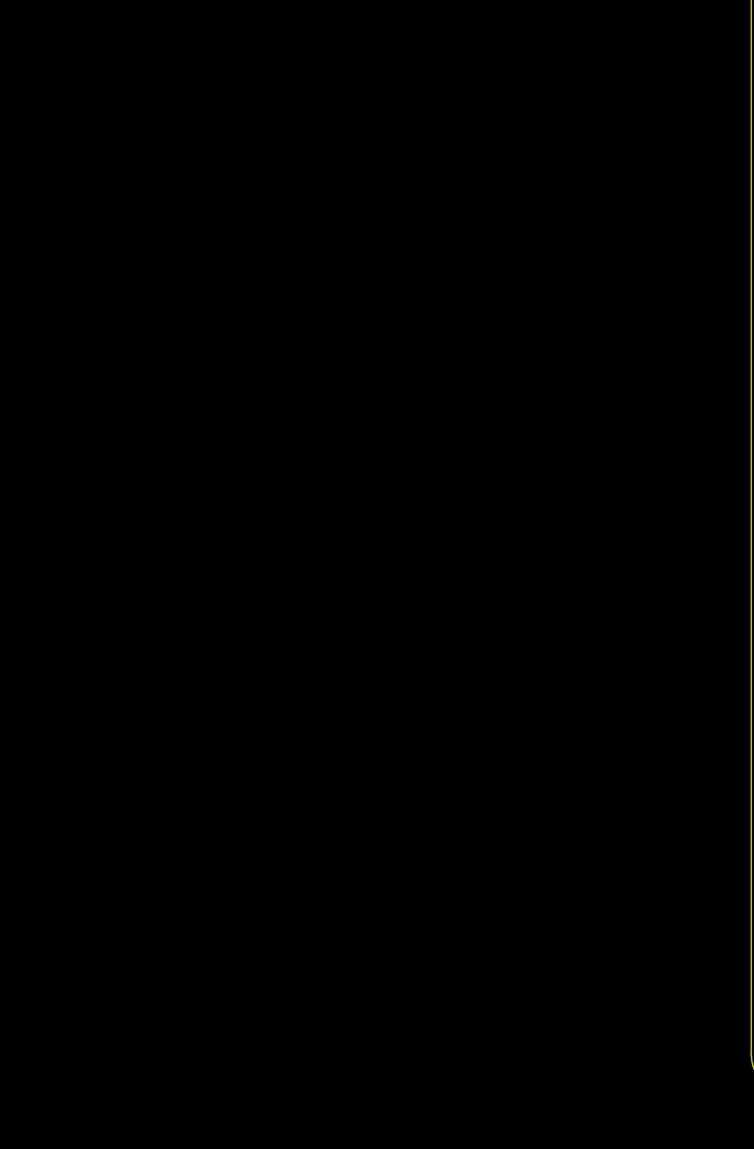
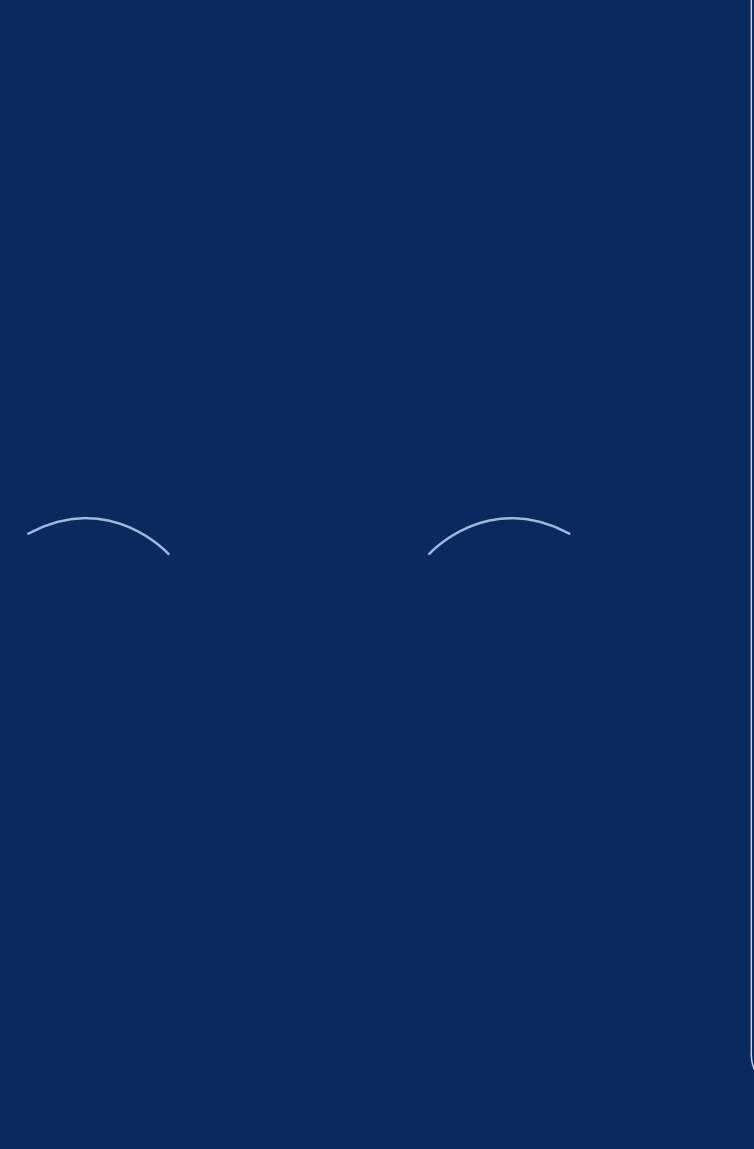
line: none -> (28, 533) (57, 521) (71, 519) (97, 518) (119, 523) (137, 531) (168, 553)
line: none -> (569, 533) (539, 521) (525, 519) (500, 518) (478, 523) (459, 531) (429, 553)

